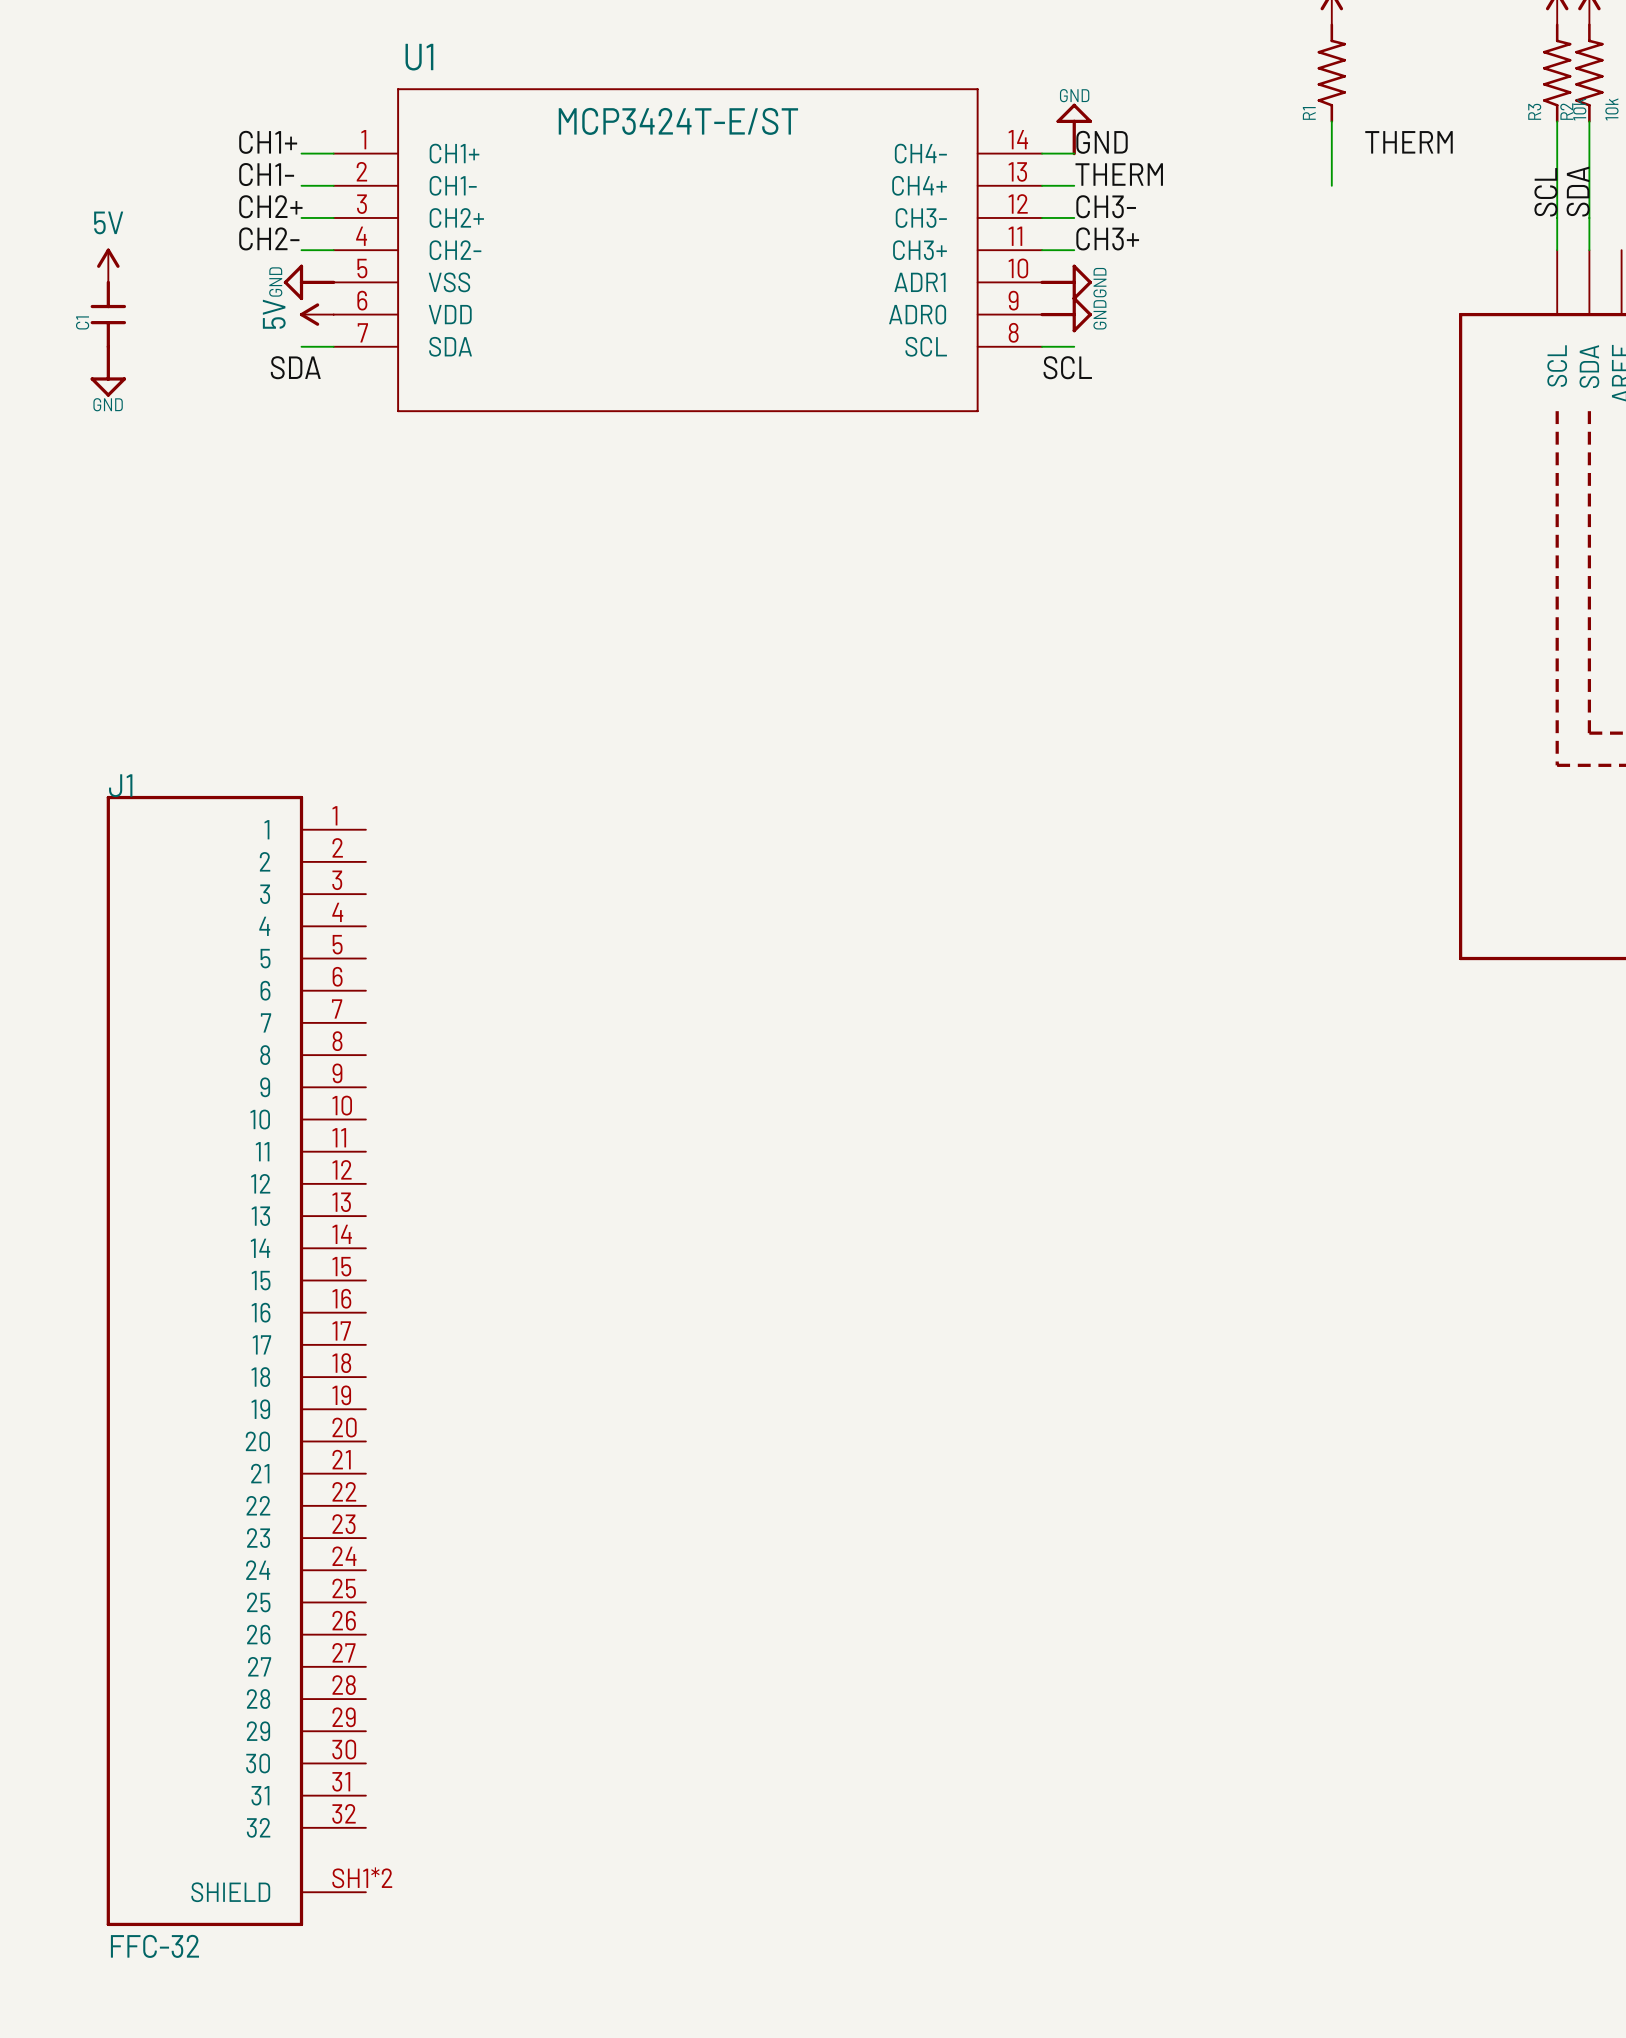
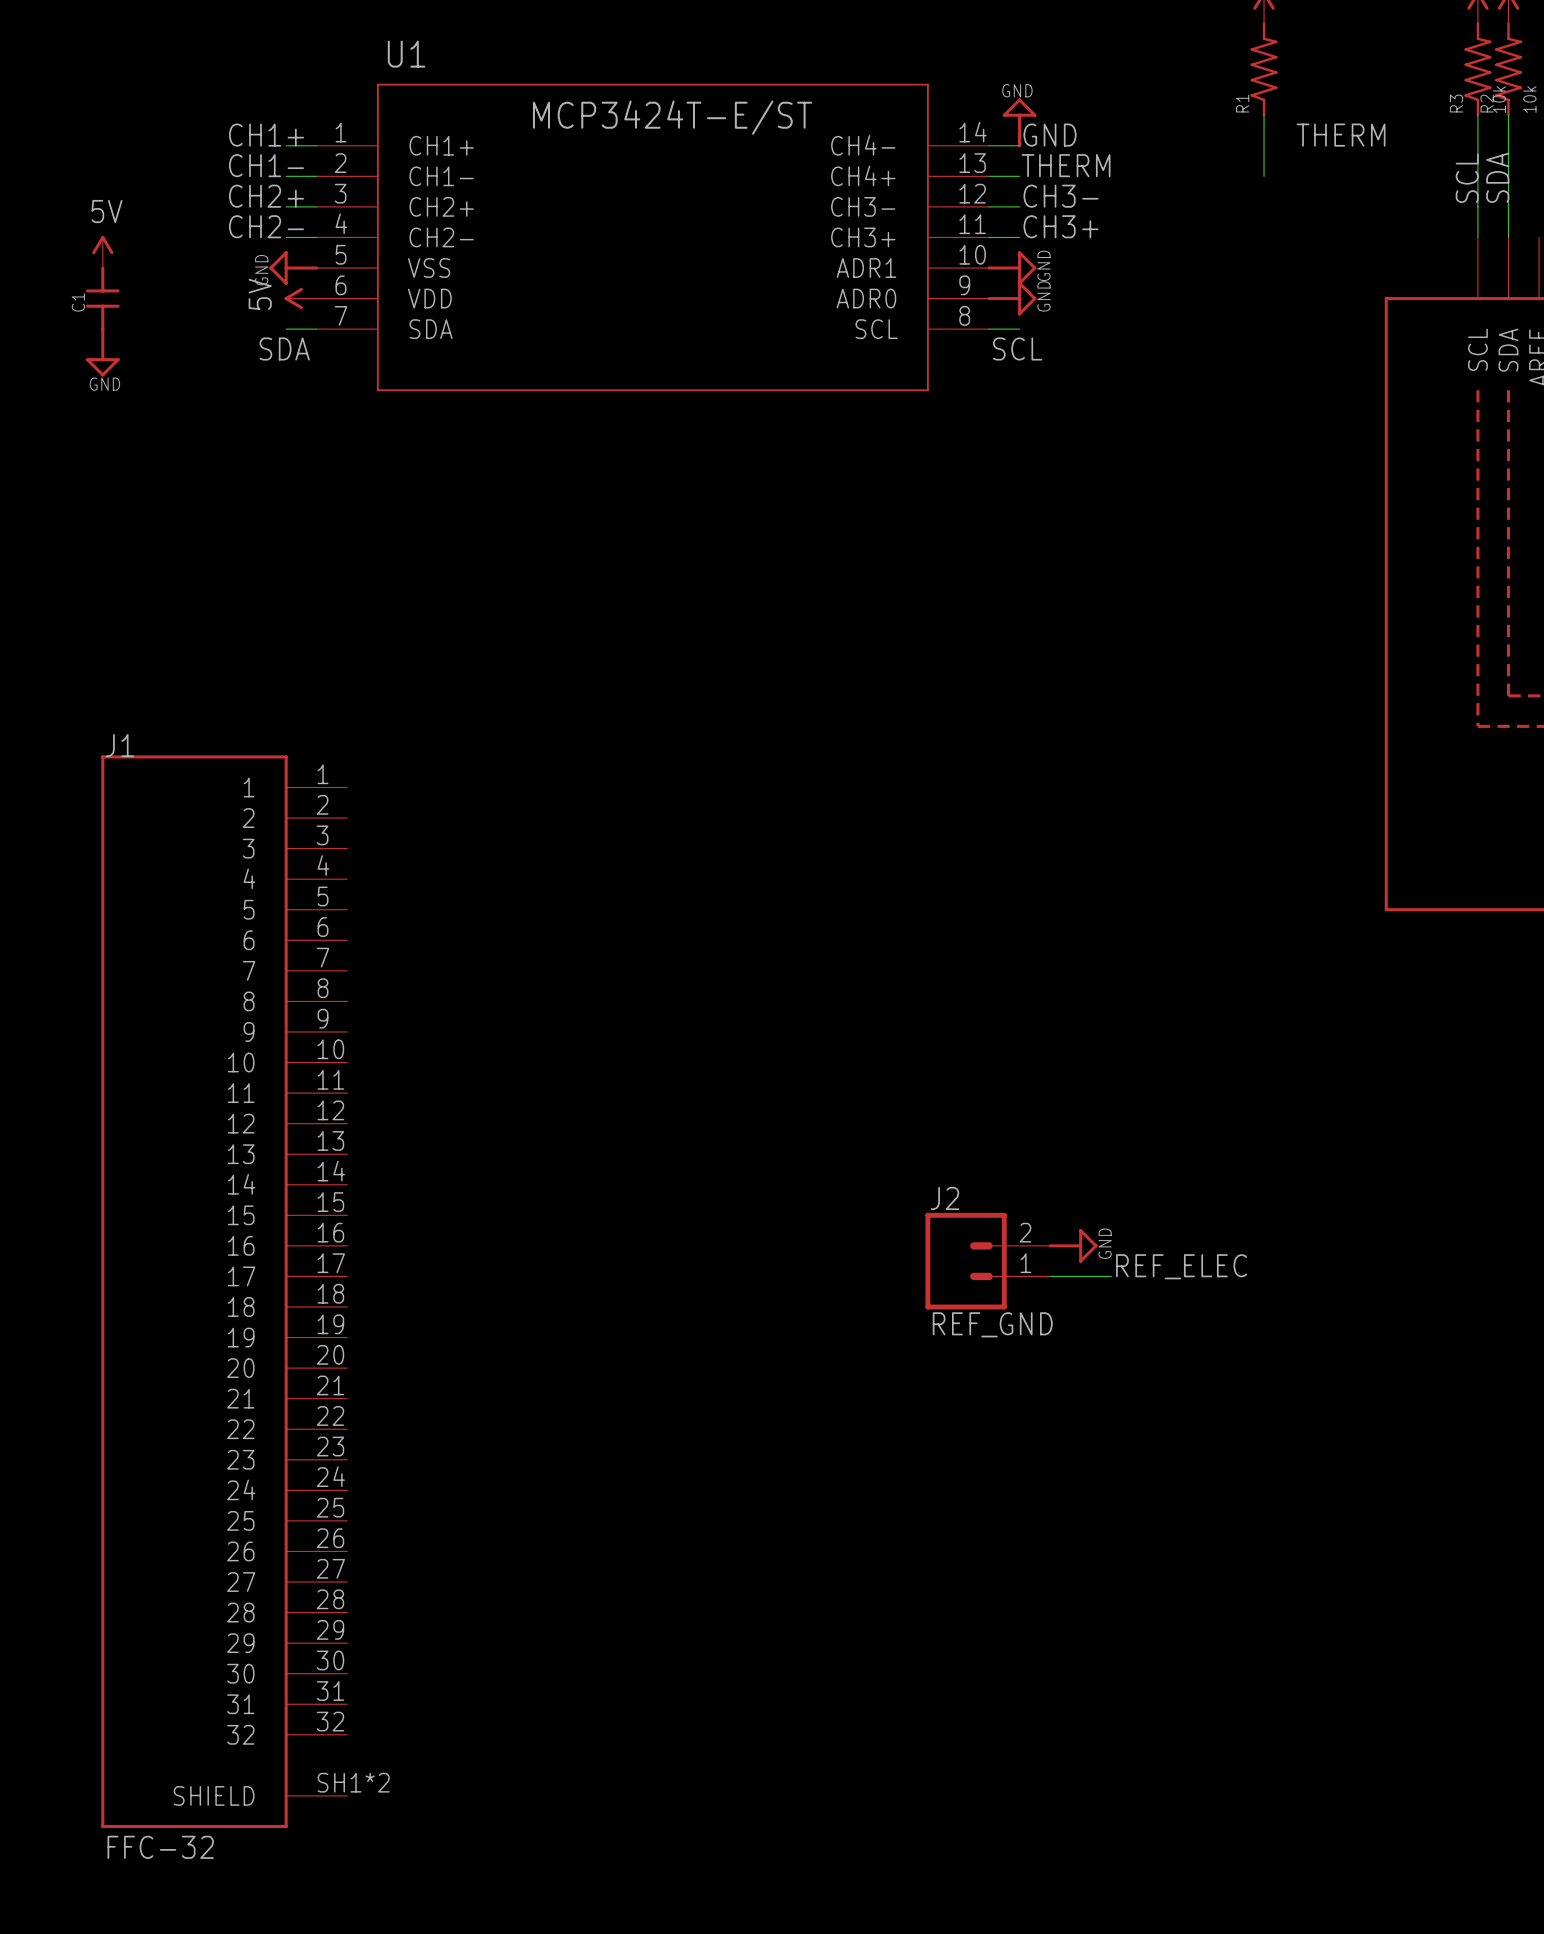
power symbol: none -> GND (1073, 1245)
J2: none -> REF_GND (987, 1261)
label: none -> REF_ELEC (1181, 1266)
wire: none -> (1050, 1276) (1111, 1276)

